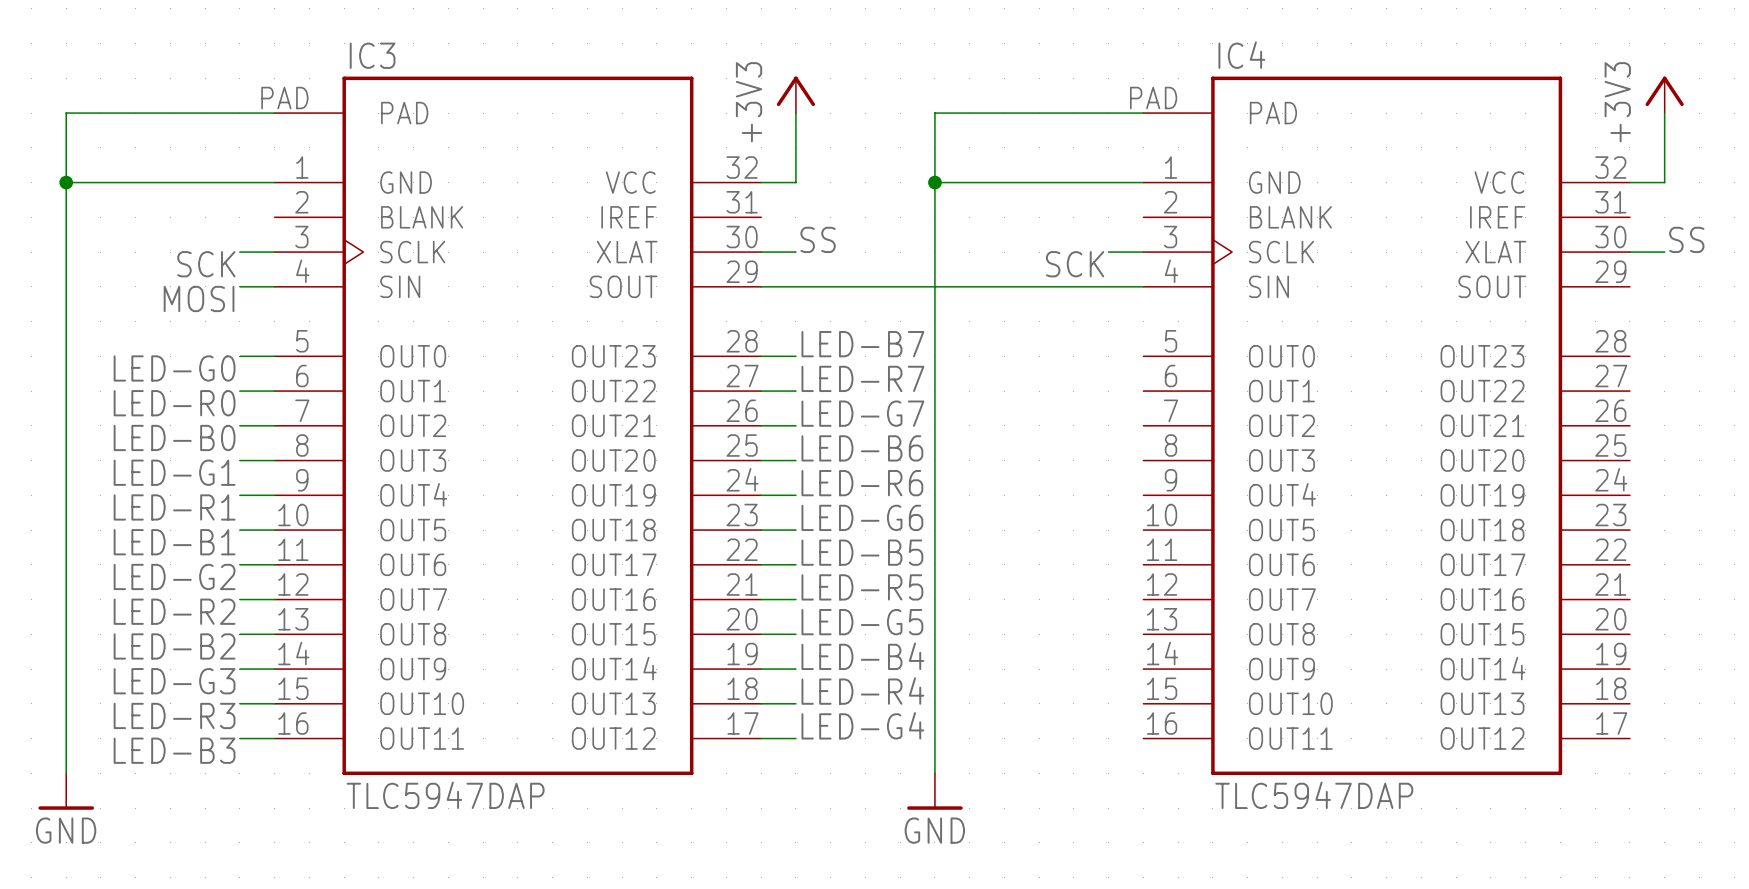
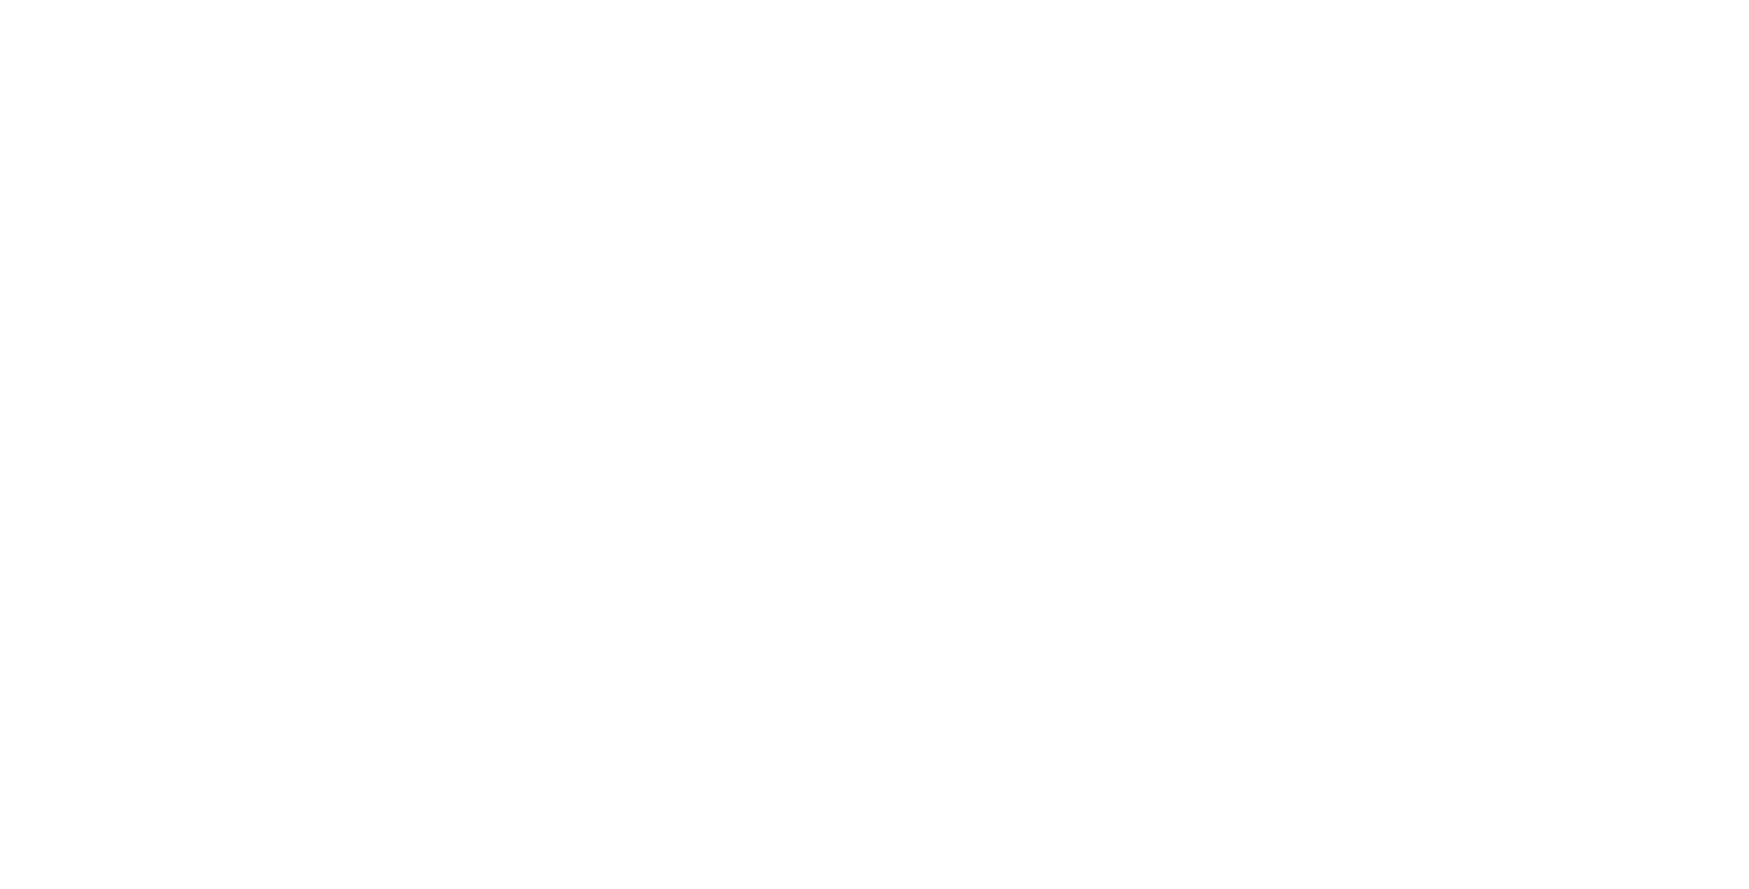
power symbol: +3V3 (795, 94) -> none
power symbol: +3V3 (1664, 94) -> none
wire: (274, 113) (66, 113) (66, 773) -> none
wire: (795, 113) (795, 182) (761, 182) -> none
wire: (1143, 113) (934, 113) (934, 773) -> none
wire: (1664, 113) (1664, 182) (1629, 182) -> none
wire: (66, 182) (274, 182) -> none
junction: (66, 182) -> none
wire: (934, 182) (1143, 182) -> none
junction: (934, 182) -> none
label: SS (818, 239) -> none
label: SS (1686, 239) -> none
wire: (239, 252) (274, 252) -> none
wire: (761, 252) (795, 252) -> none
wire: (1108, 252) (1143, 252) -> none
wire: (1629, 252) (1664, 252) -> none
label: SCK (206, 264) -> none
label: SCK (1075, 264) -> none
wire: (239, 286) (274, 286) -> none
wire: (761, 286) (1143, 286) -> none
label: MOSI (199, 298) -> none
label: LED-B7 (862, 344) -> none
wire: (239, 356) (274, 356) -> none
wire: (761, 356) (795, 356) -> none
label: LED-G0 (174, 368) -> none
label: LED-R7 (862, 378) -> none
wire: (239, 391) (274, 391) -> none
wire: (761, 391) (795, 391) -> none
label: LED-R0 (174, 403) -> none
label: LED-G7 (862, 413) -> none
wire: (239, 425) (274, 425) -> none
IC3: TLC5947DAP (517, 425) -> none
wire: (761, 425) (795, 425) -> none
IC4: TLC5947DAP (1386, 425) -> none
label: LED-B0 (174, 437) -> none
label: LED-B6 (862, 448) -> none
wire: (239, 460) (274, 460) -> none
wire: (761, 460) (795, 460) -> none
label: LED-G1 (174, 472) -> none
label: LED-R6 (862, 483) -> none
wire: (239, 495) (274, 495) -> none
wire: (761, 495) (795, 495) -> none
label: LED-R1 (174, 507) -> none
label: LED-G6 (862, 517) -> none
wire: (239, 530) (274, 530) -> none
wire: (761, 530) (795, 530) -> none
label: LED-B1 (174, 542) -> none
label: LED-B5 (862, 552) -> none
wire: (239, 564) (274, 564) -> none
wire: (761, 564) (795, 564) -> none
label: LED-G2 (174, 576) -> none
label: LED-R5 (862, 587) -> none
wire: (239, 599) (274, 599) -> none
wire: (761, 599) (795, 599) -> none
label: LED-R2 (174, 611) -> none
label: LED-G5 (862, 622) -> none
wire: (239, 634) (274, 634) -> none
wire: (761, 634) (795, 634) -> none
label: LED-B2 (174, 646) -> none
label: LED-B4 (862, 656) -> none
wire: (239, 669) (274, 669) -> none
wire: (761, 669) (795, 669) -> none
label: LED-G3 (174, 681) -> none
label: LED-R4 (862, 691) -> none
wire: (239, 703) (274, 703) -> none
wire: (761, 703) (795, 703) -> none
label: LED-R3 (174, 715) -> none
label: LED-G4 (862, 725) -> none
wire: (239, 738) (274, 738) -> none
wire: (761, 738) (795, 738) -> none
label: LED-B3 (174, 750) -> none
power symbol: GND (66, 791) -> none
power symbol: GND (934, 791) -> none

